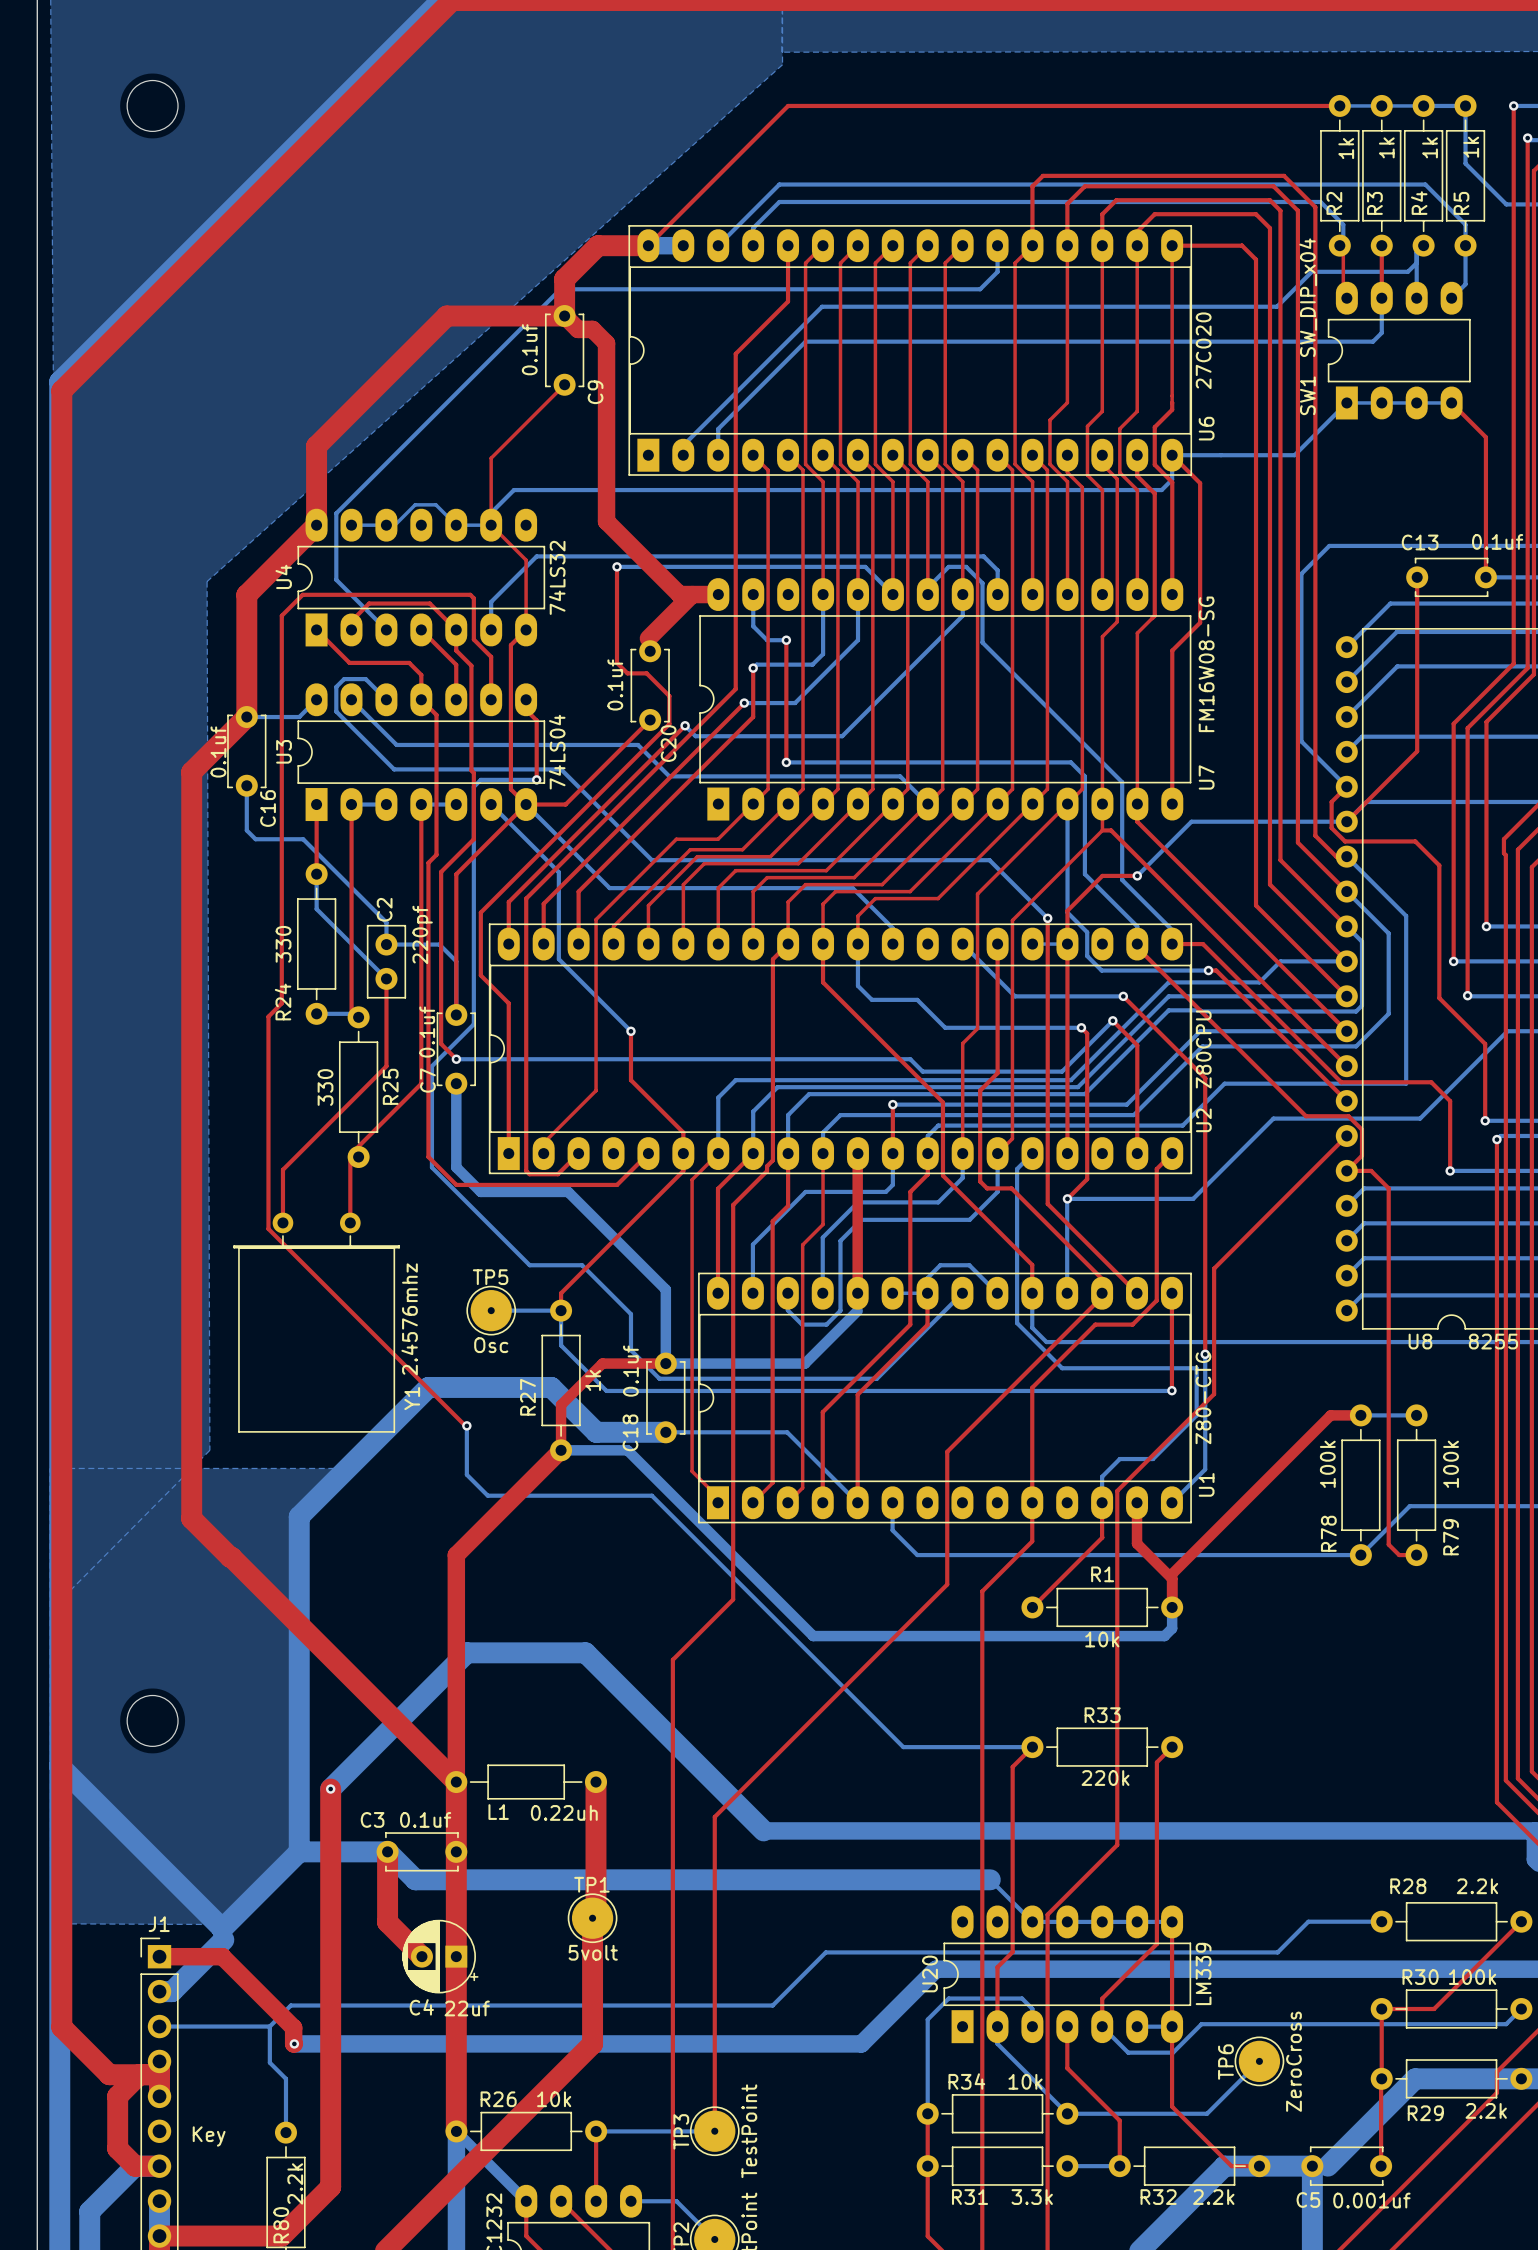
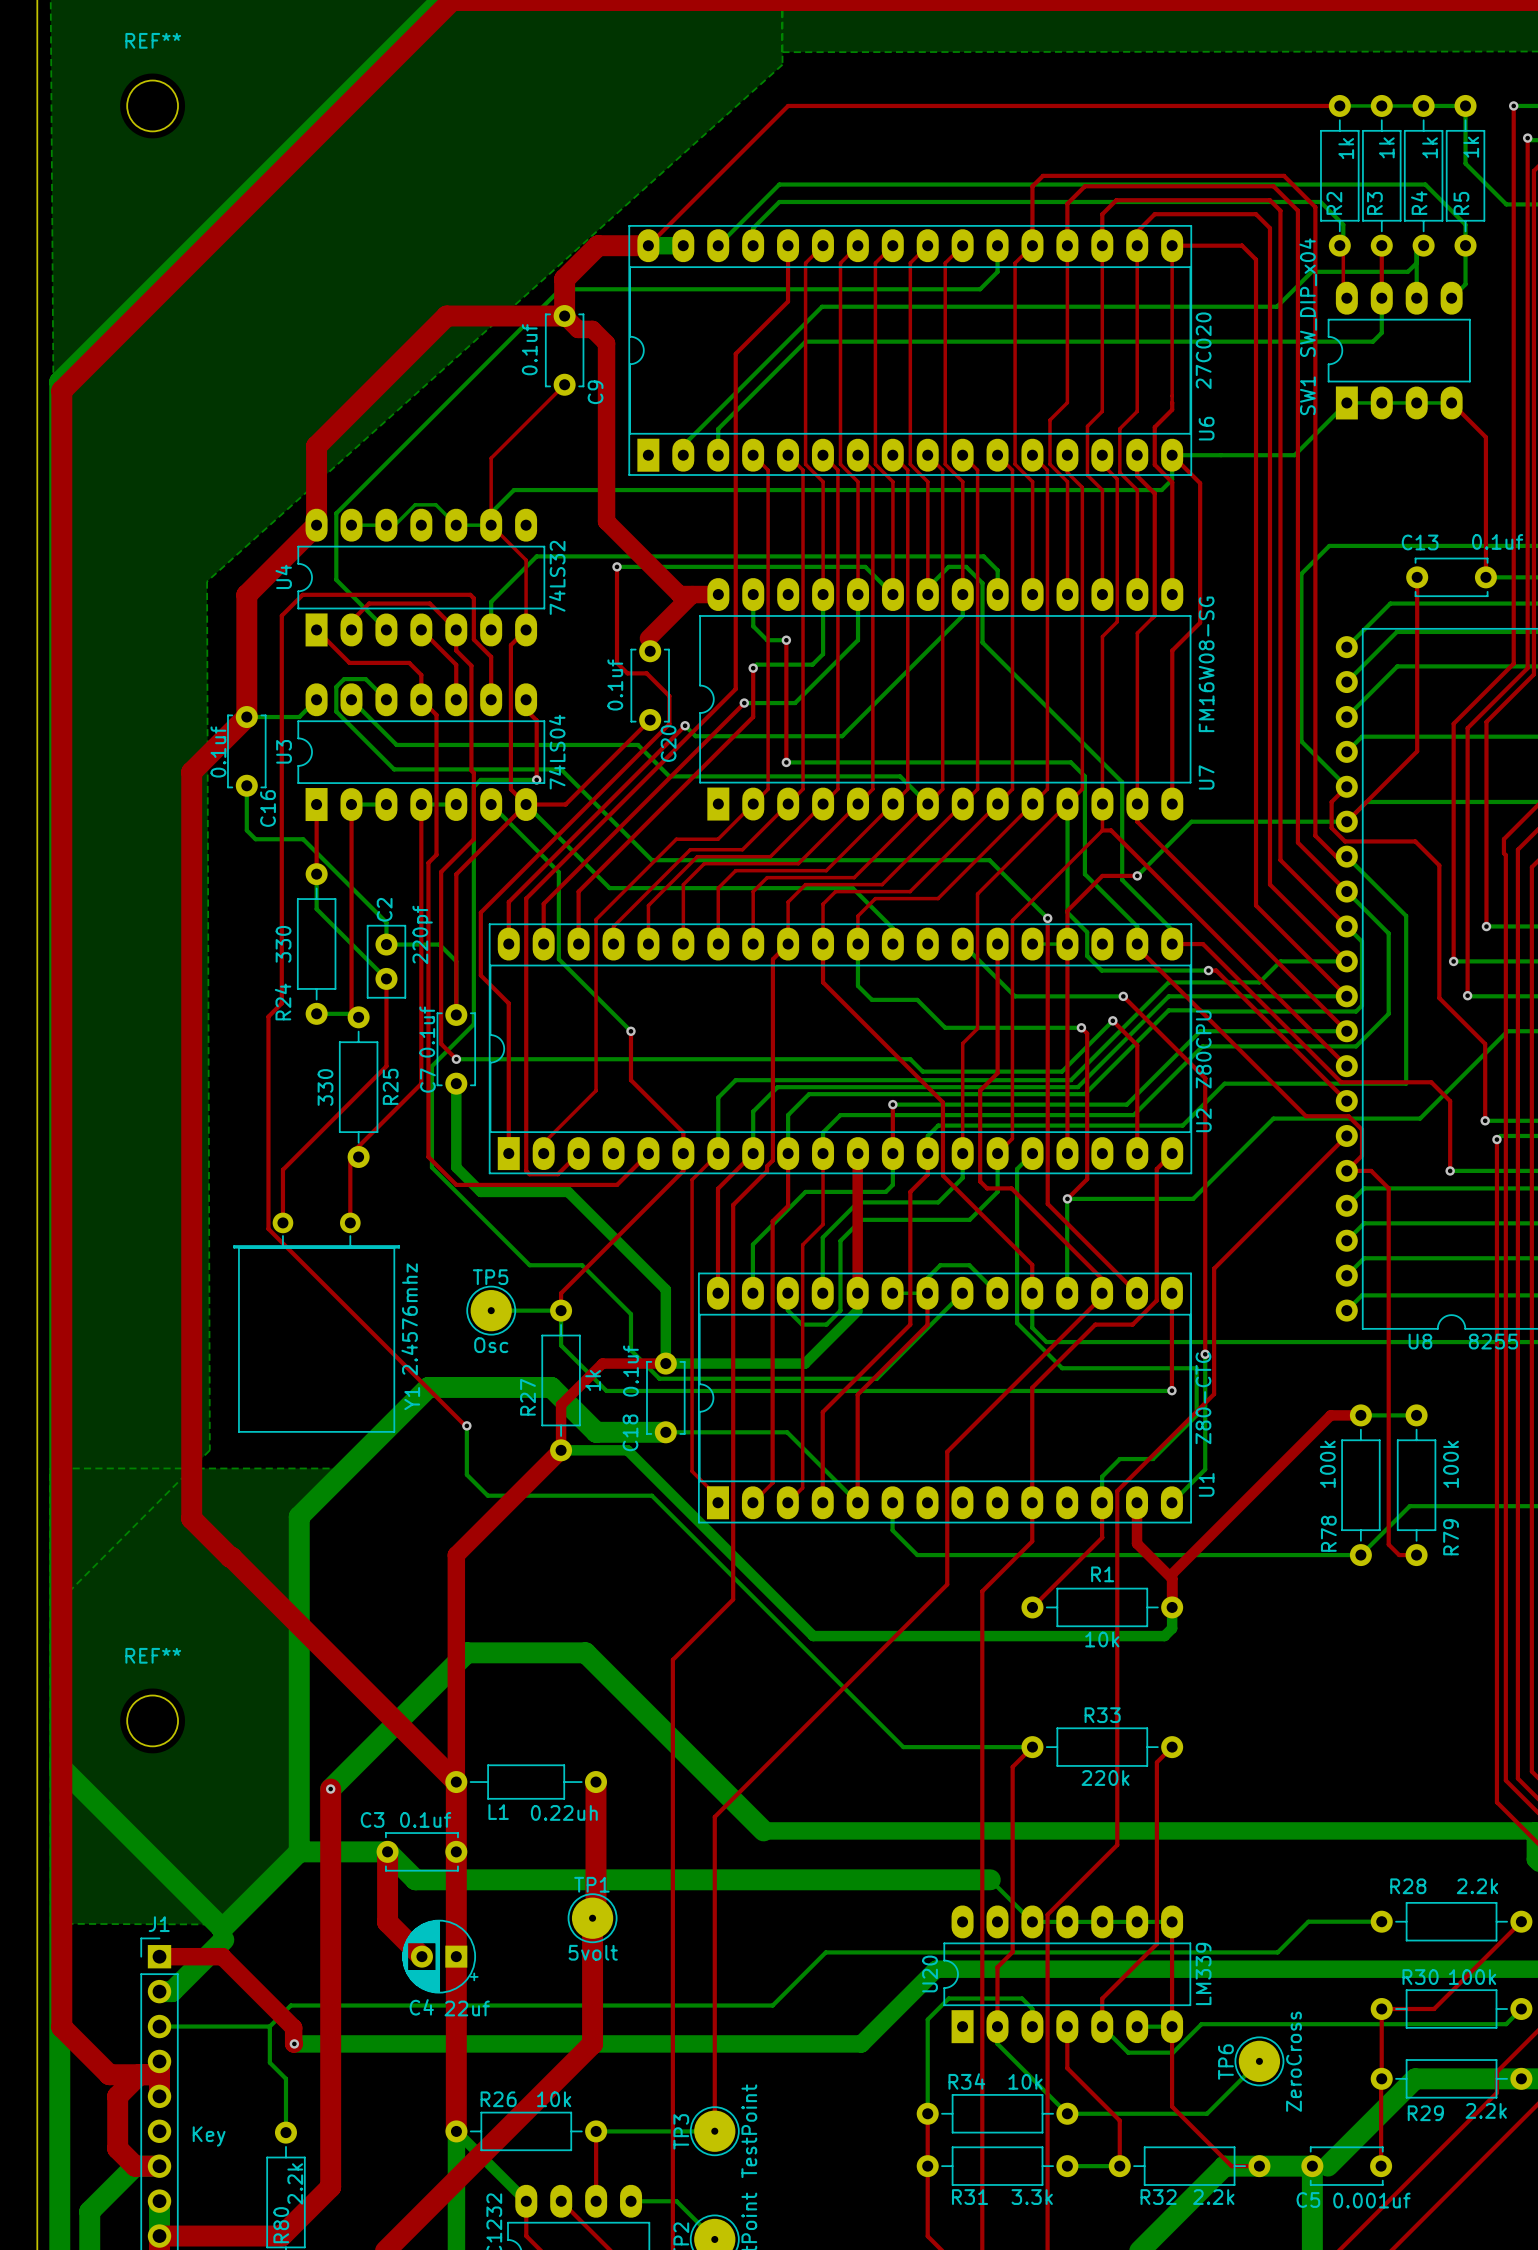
REF** name: none -> REF** (153, 40)
REF** name: none -> REF** (153, 1655)

